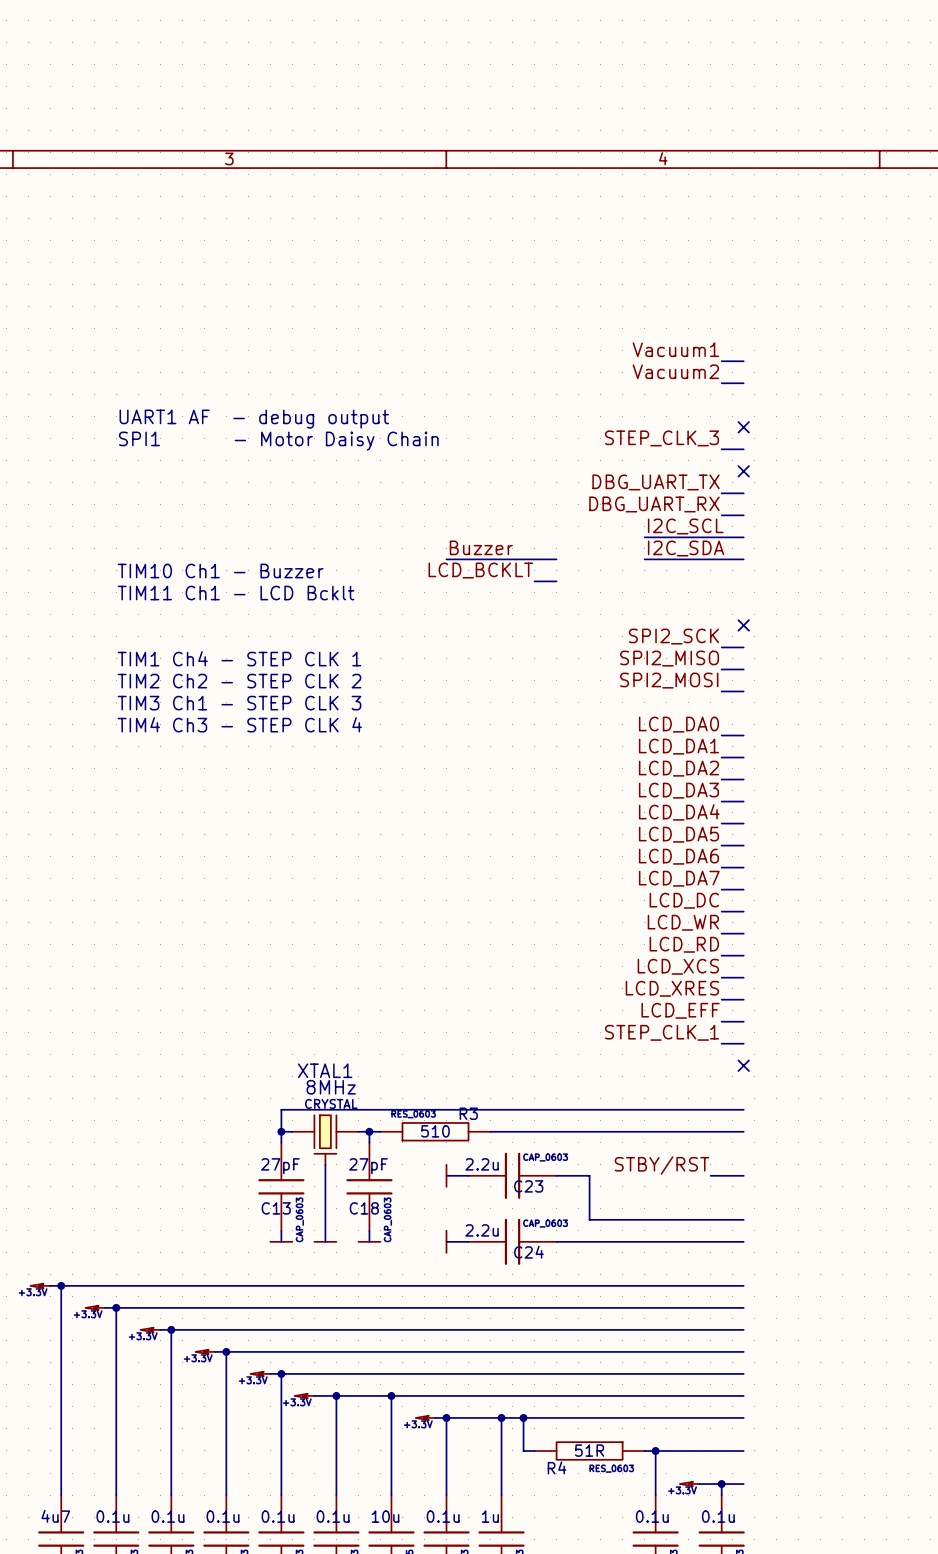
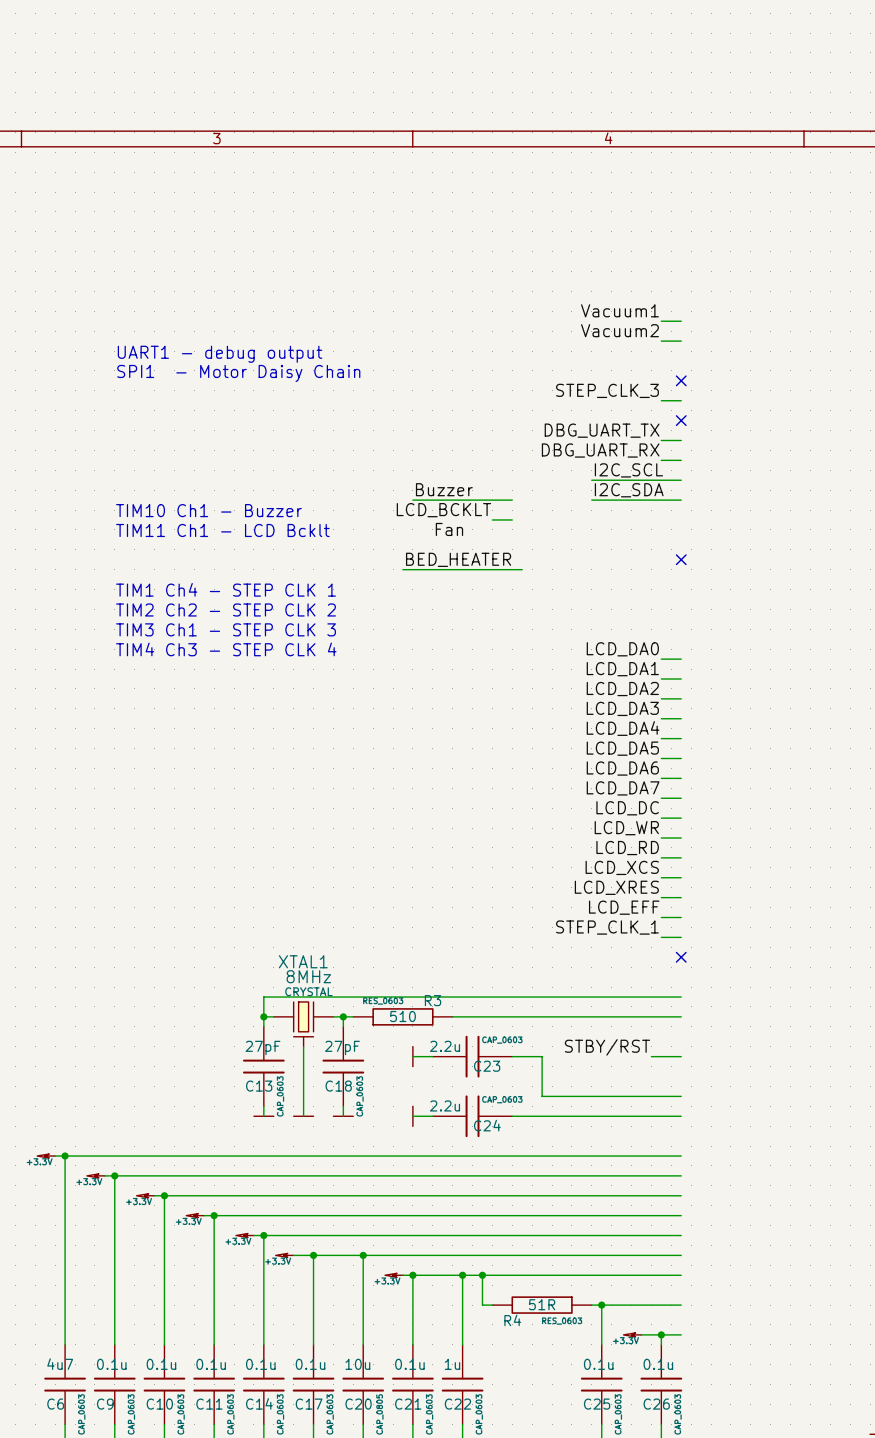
text: none -> UART1 - debug output (220, 354)
text: UART1 AF - debug output (254, 419) -> SPI1 - Motor Daisy Chain (238, 373)
text: SPI1 - Motor Daisy Chain (278, 441) -> none
label: none -> Fan (449, 529)
label: none -> BED_HEATER (458, 559)
wire: none -> (402, 569) (522, 569)
label: SPI2_SCK (673, 636) -> none
wire: (721, 647) (743, 647) -> none
label: SPI2_MISO (669, 658) -> none
wire: (721, 669) (743, 669) -> none
label: SPI2_MOSI (669, 680) -> none
wire: (721, 691) (743, 691) -> none

